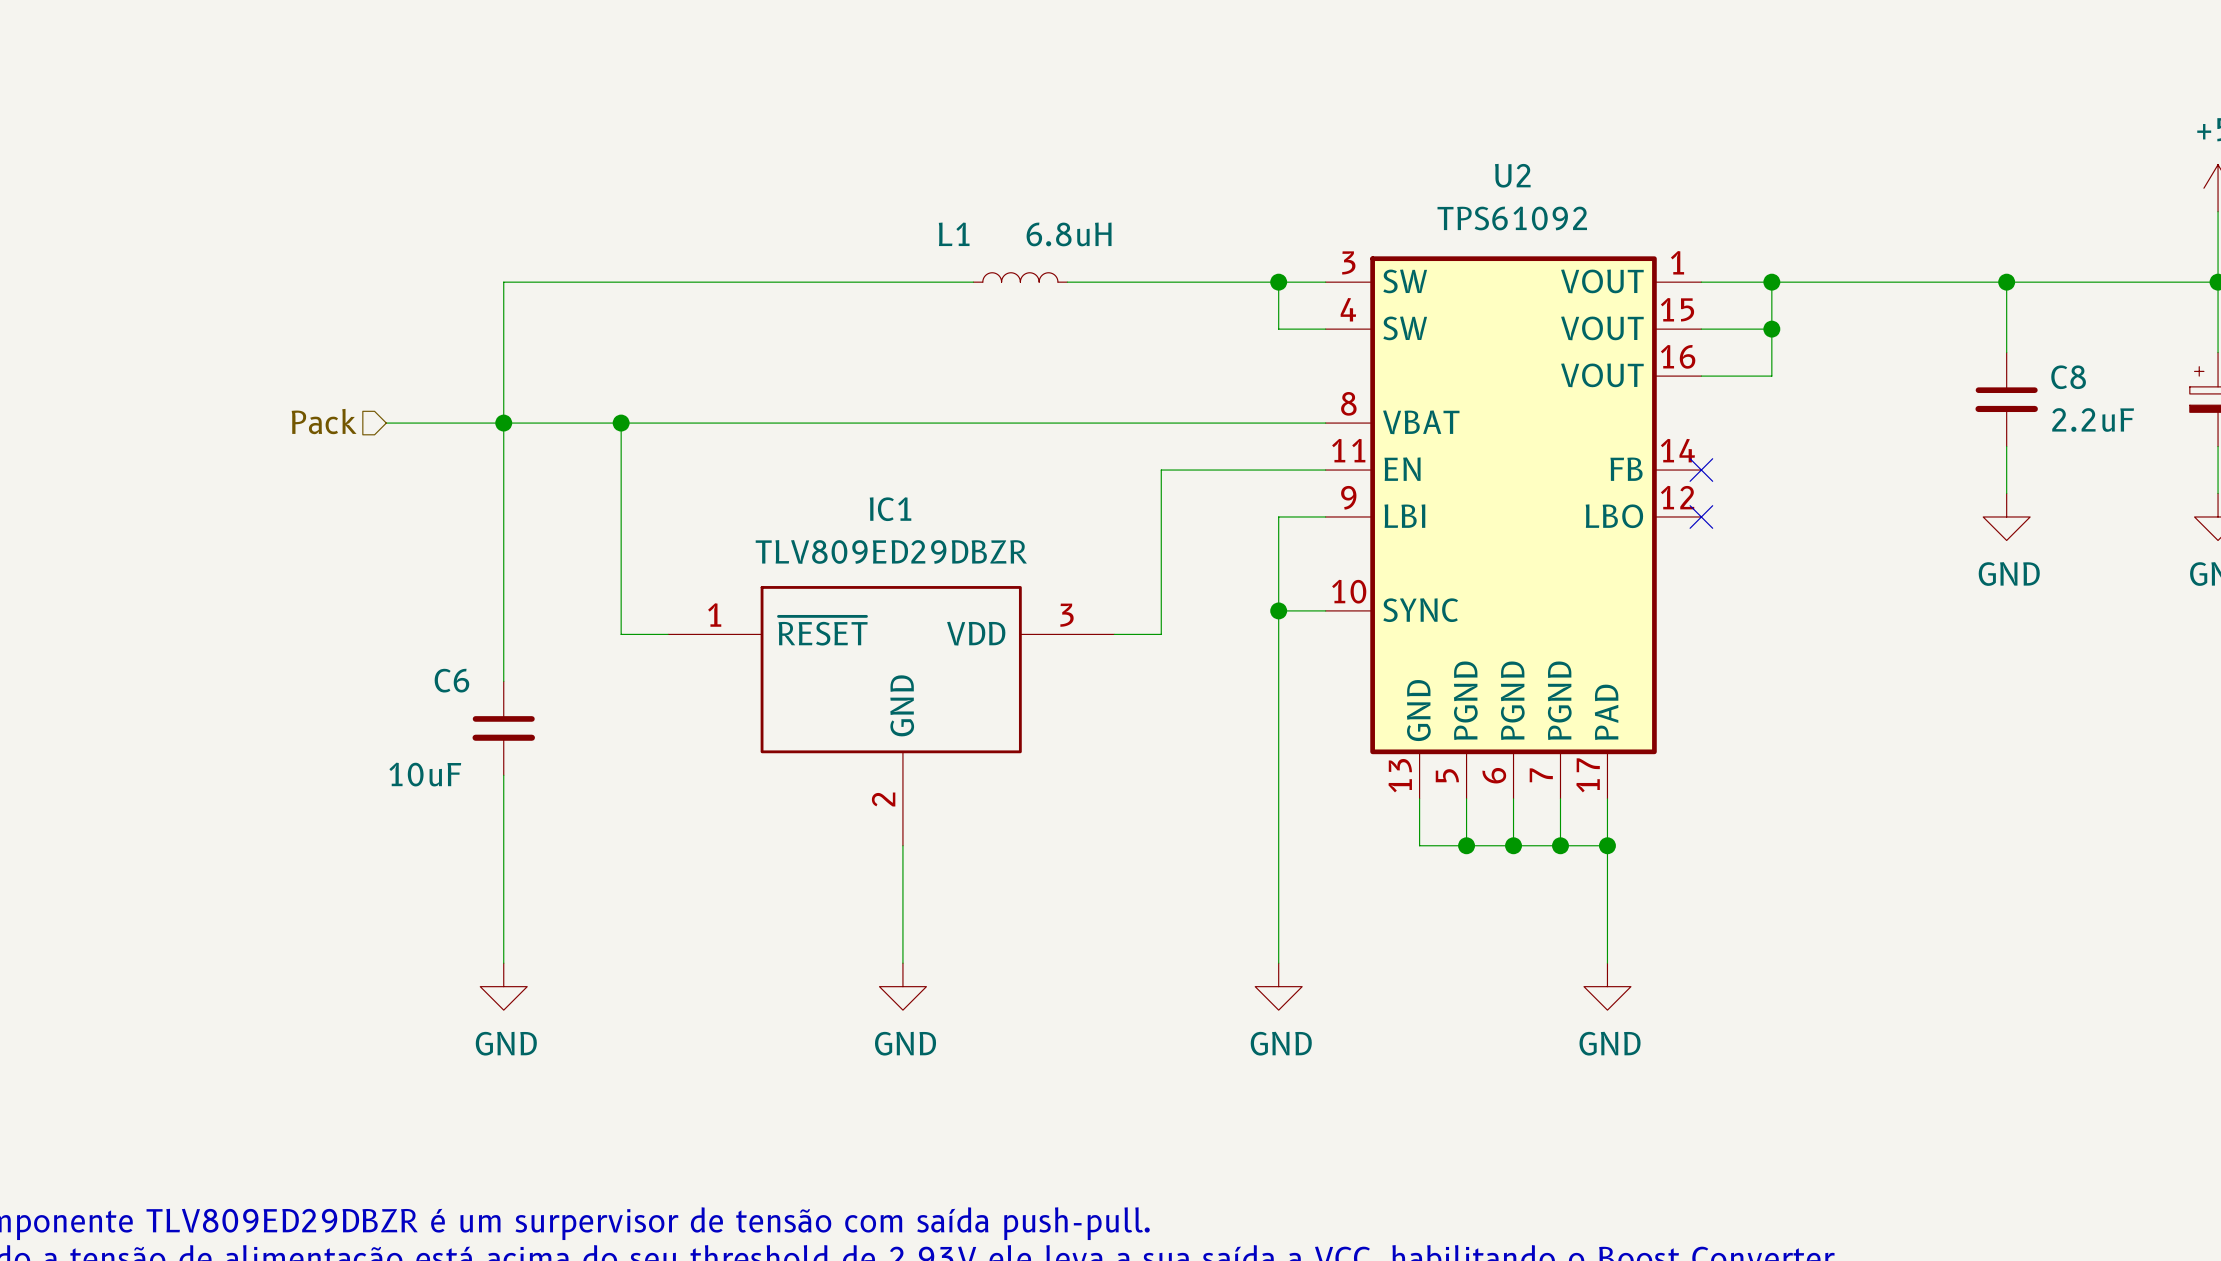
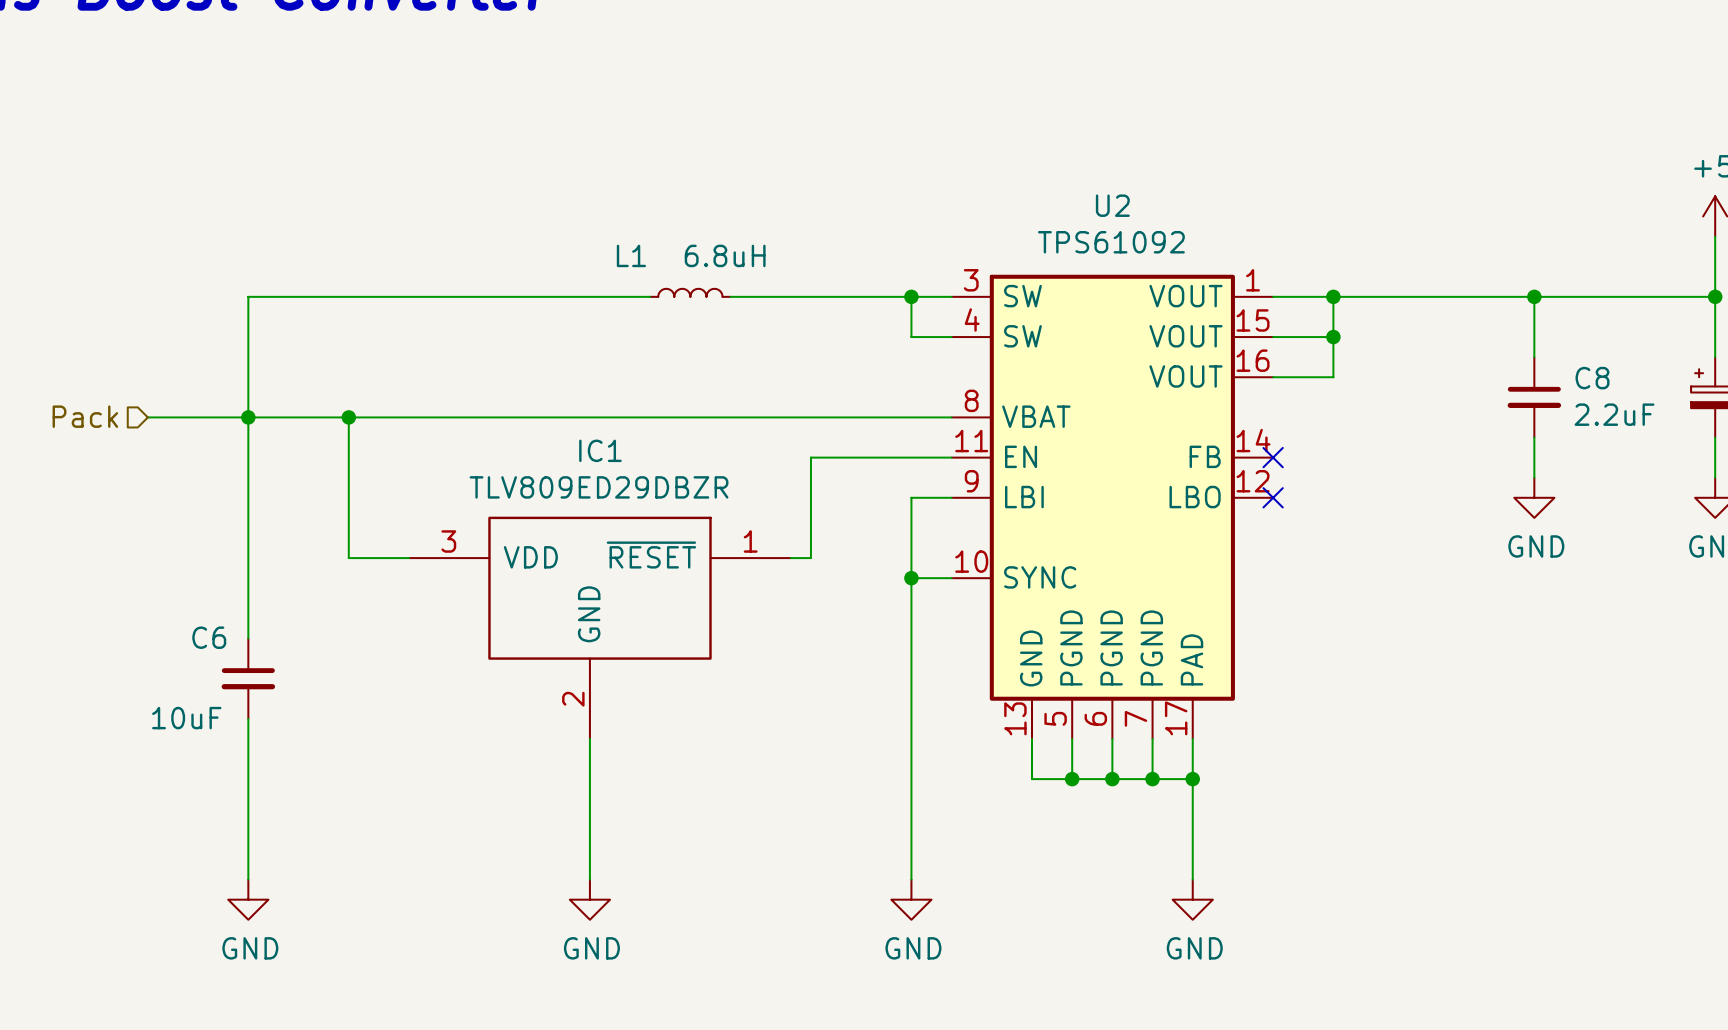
wire: (621, 587) (621, 634) (668, 634) -> (348, 558) (409, 558)
wire: (1161, 587) (1161, 634) (1114, 634) -> (810, 558) (790, 558)
IC1 flip: as is (891, 669) -> left-right (599, 588)

